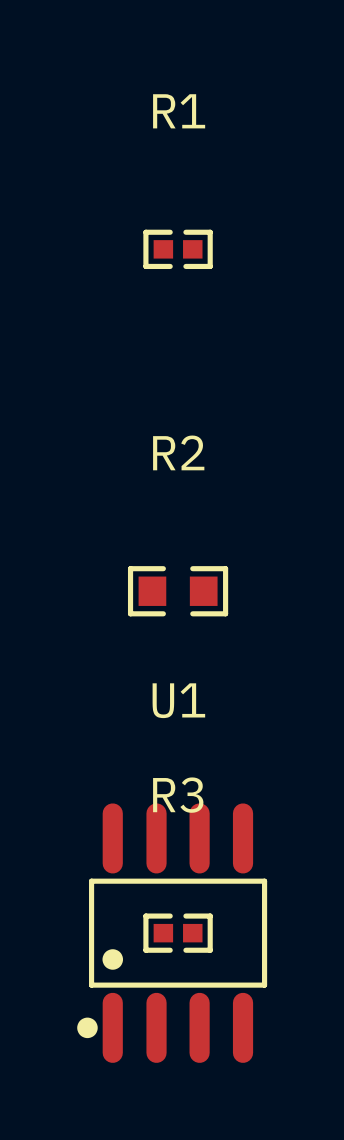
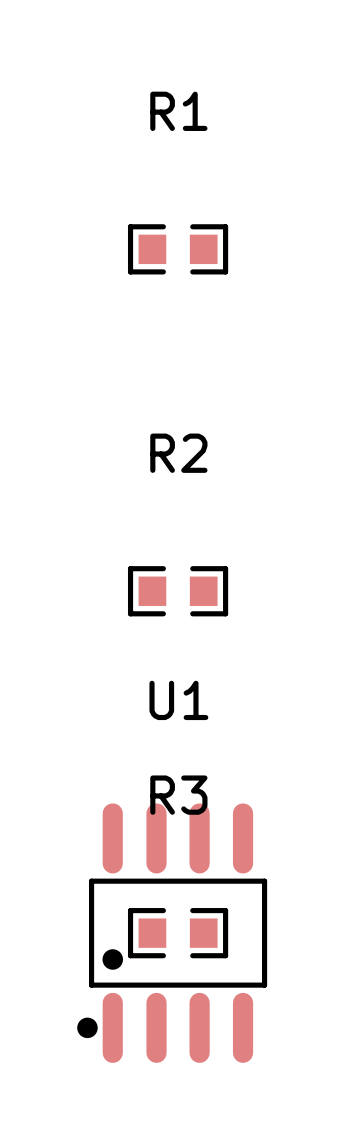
R1 footprint: [143, 229, 213, 270] -> [127, 224, 229, 275]
R3 footprint: [143, 913, 213, 953] -> [127, 908, 229, 959]

